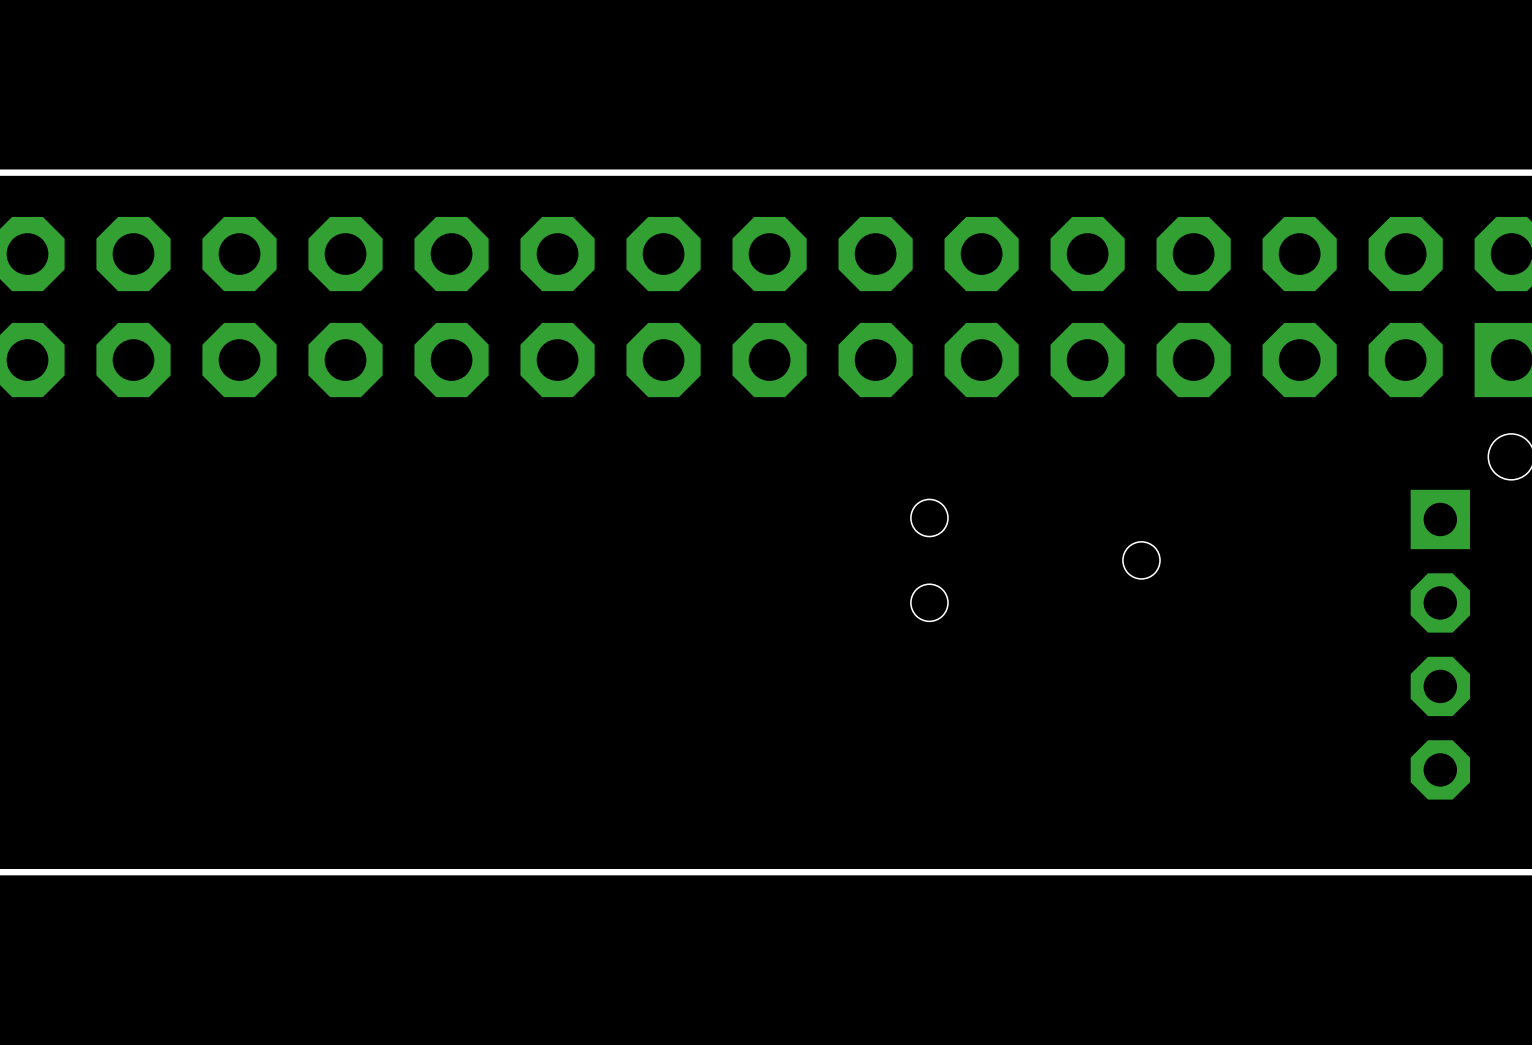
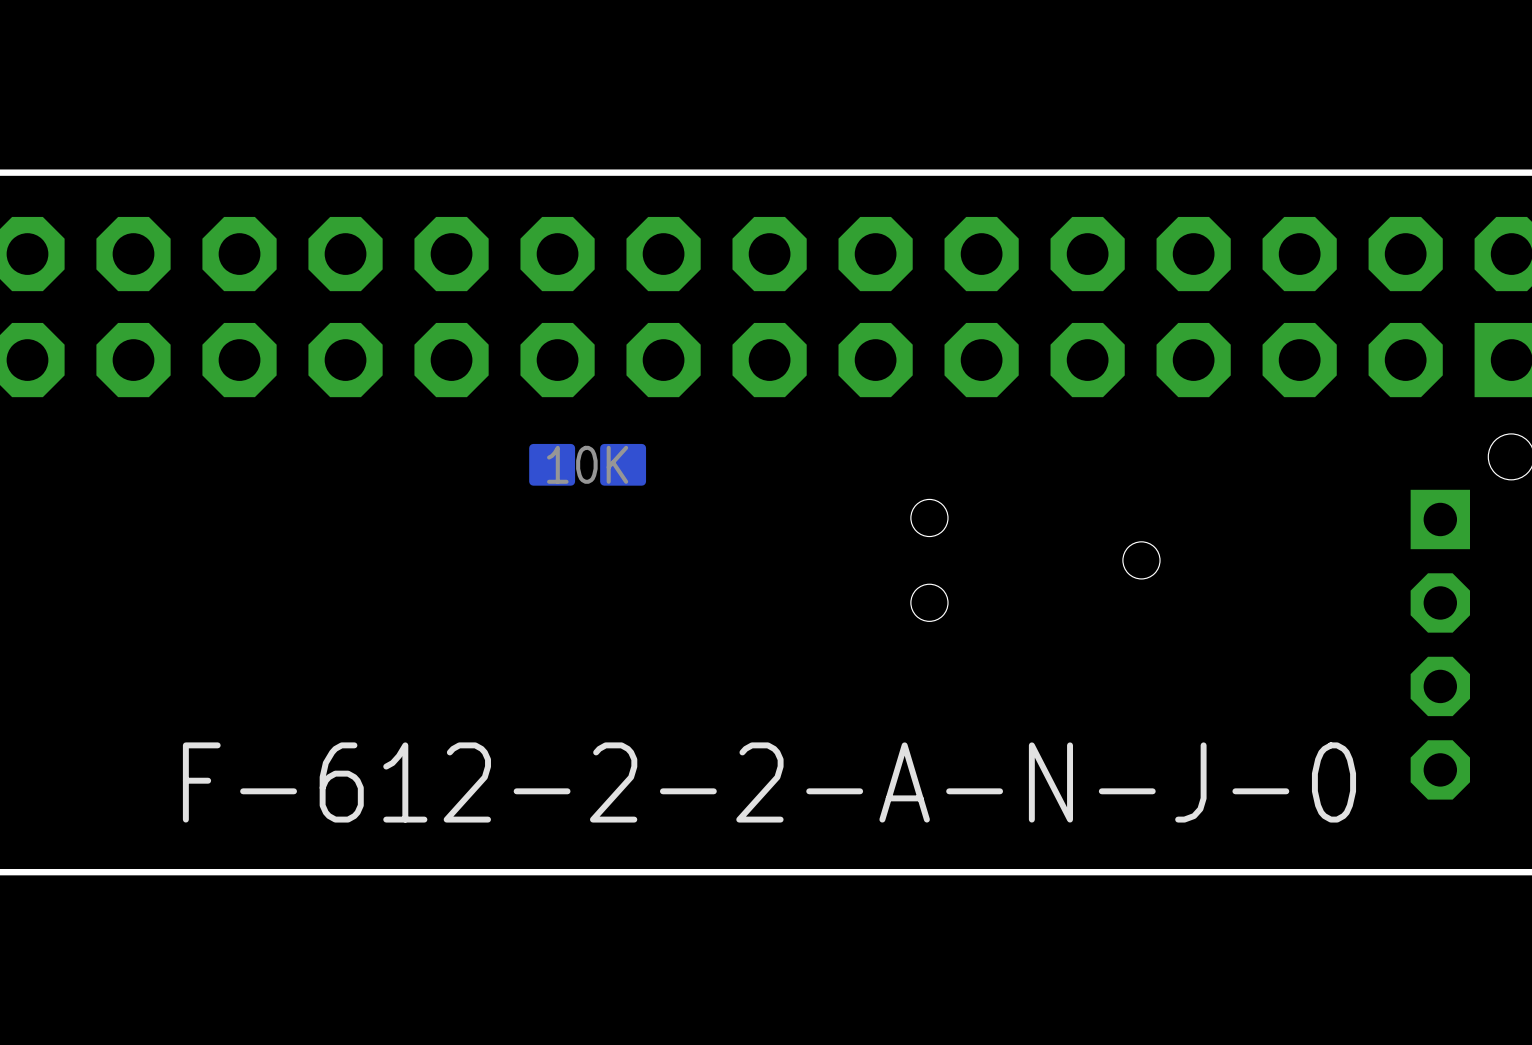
part: none -> 10K (587, 464)
text: none -> F-612-2-2-A-N-J-0 (769, 782)

